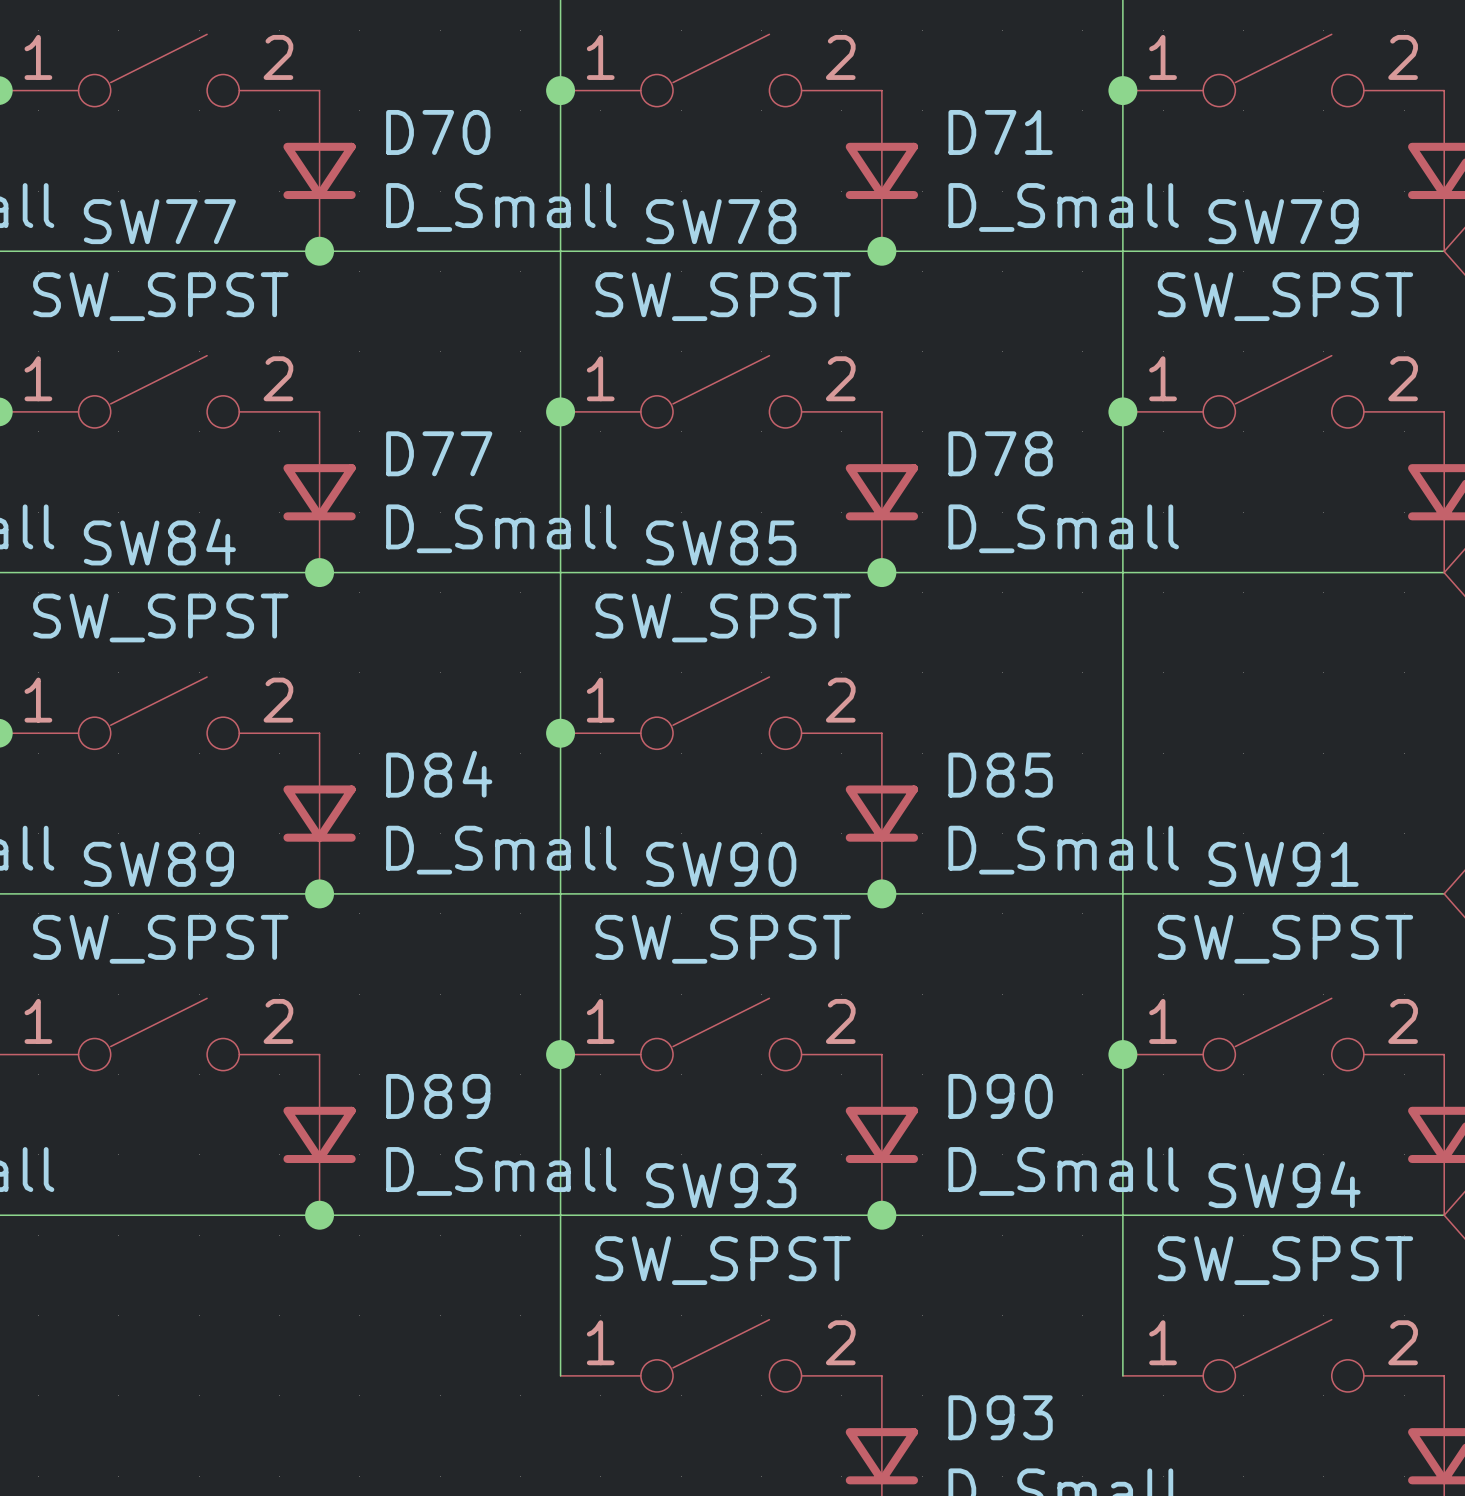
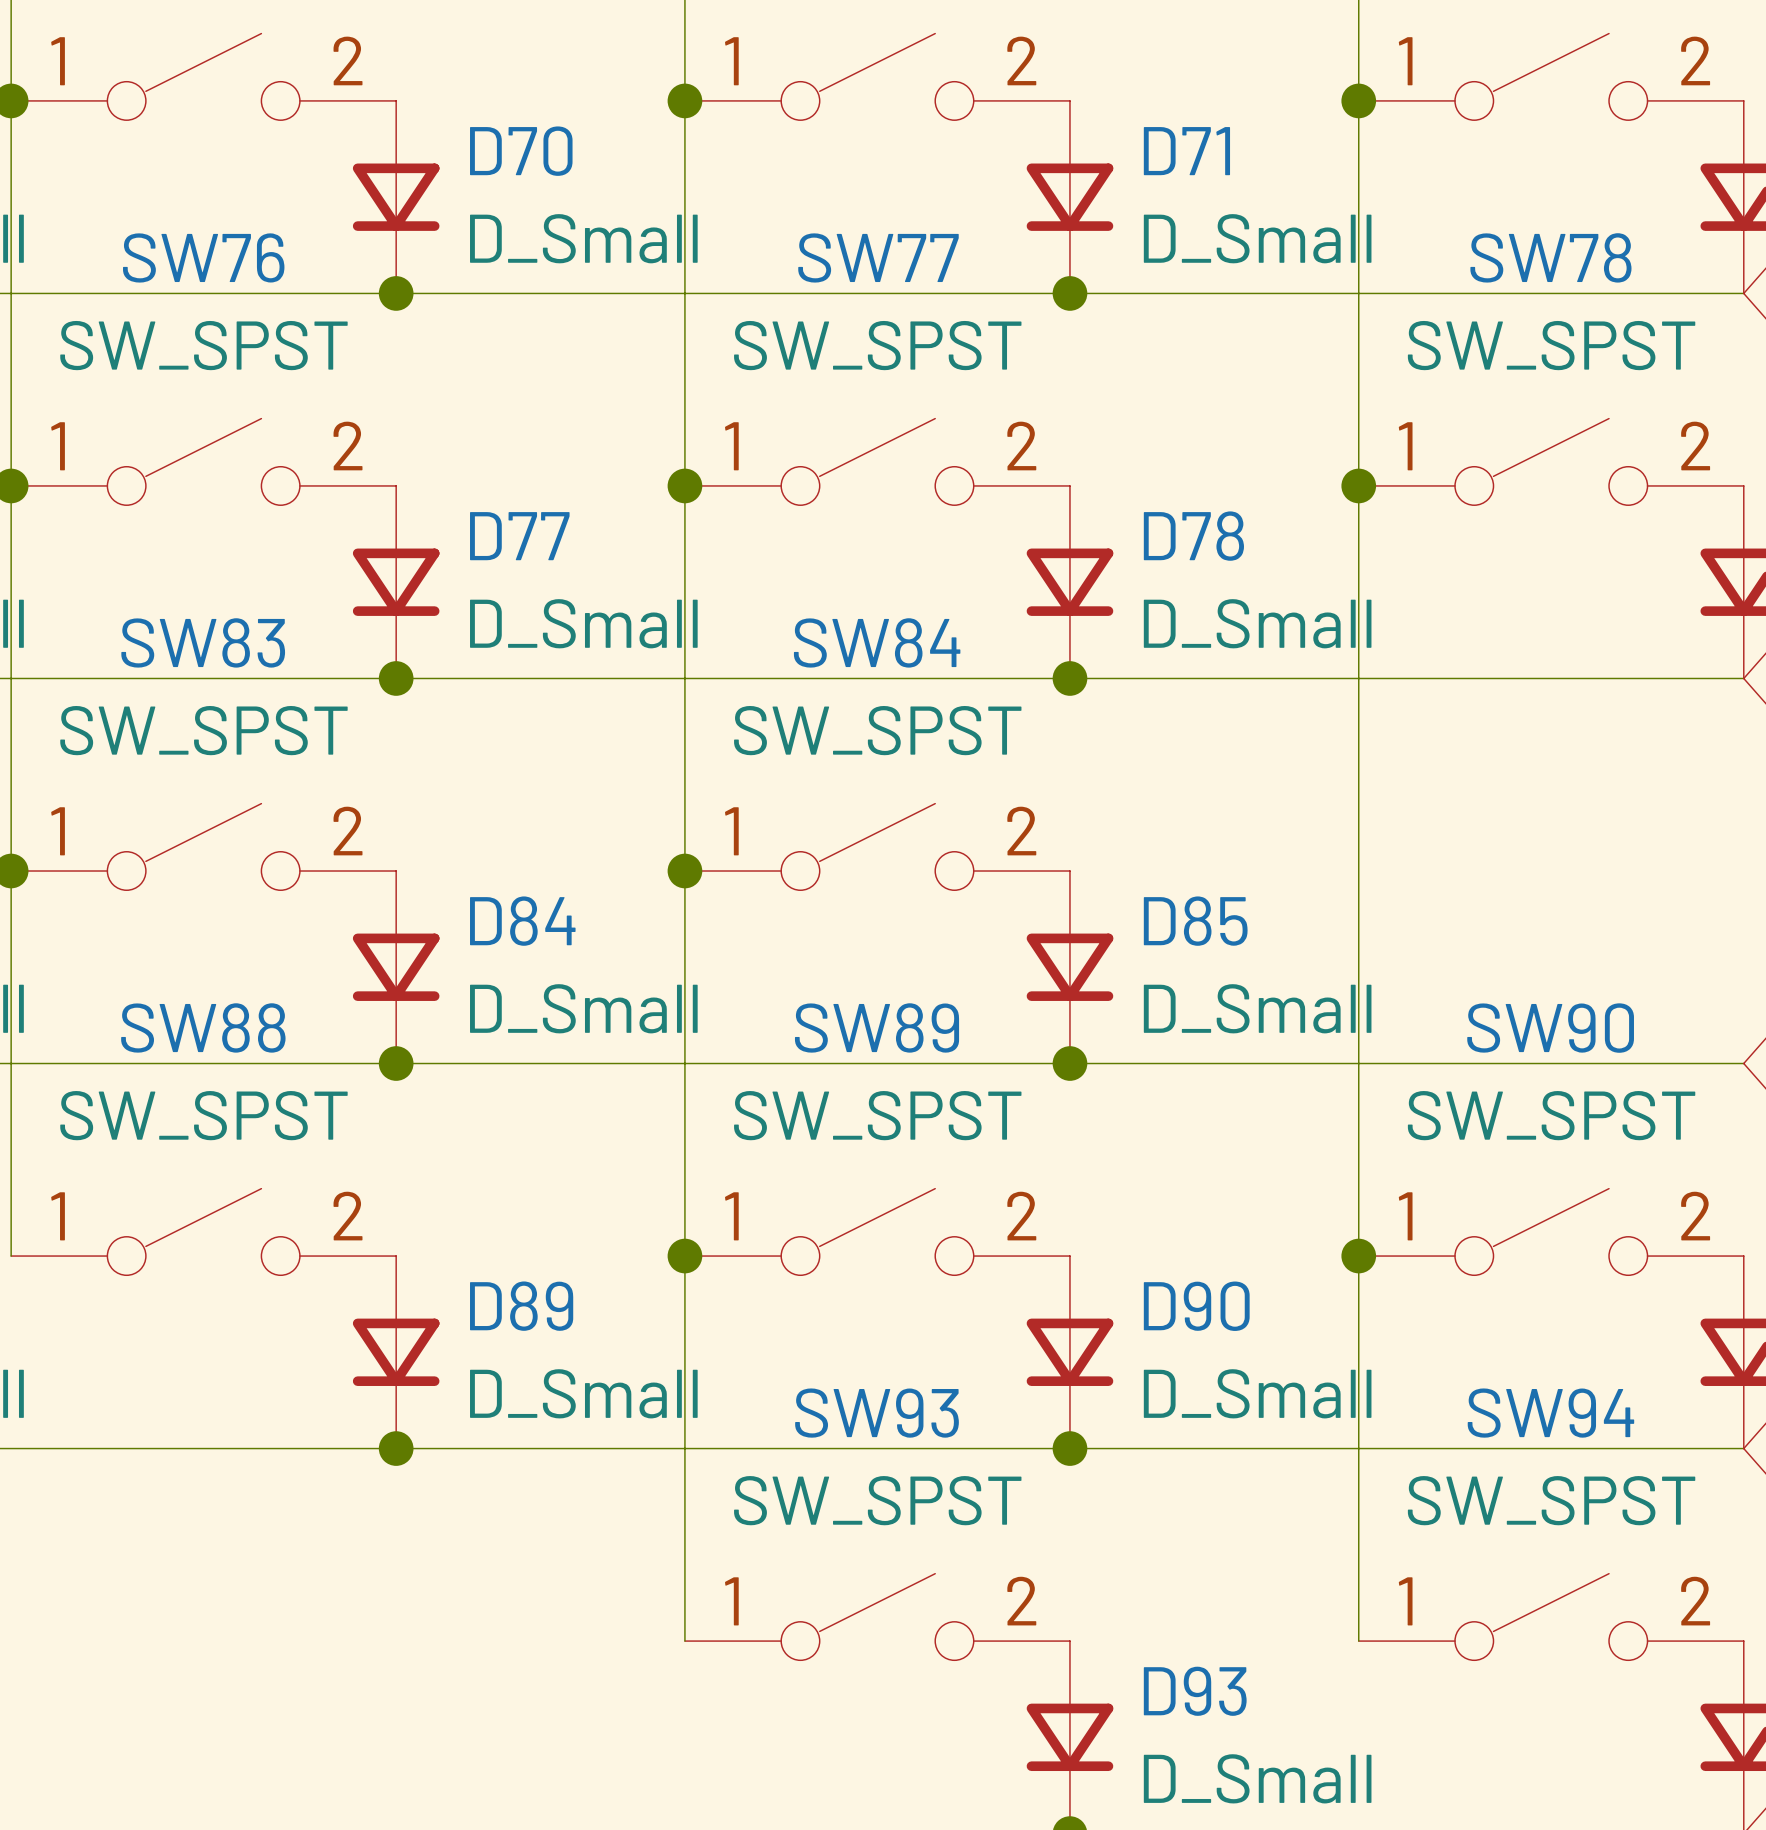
SW77 name: SW77 (159, 221) -> SW76 (203, 257)
SW78 name: SW78 (721, 221) -> SW77 (878, 257)
SW79 name: SW79 (1283, 221) -> SW78 (1550, 257)
SW84 name: SW84 (159, 542) -> SW83 (203, 642)
SW85 name: SW85 (721, 542) -> SW84 (877, 642)
SW89 name: SW89 (158, 864) -> SW88 (203, 1027)
SW90 name: SW90 (721, 864) -> SW89 (877, 1027)
SW91 name: SW91 (1283, 864) -> SW90 (1550, 1028)

